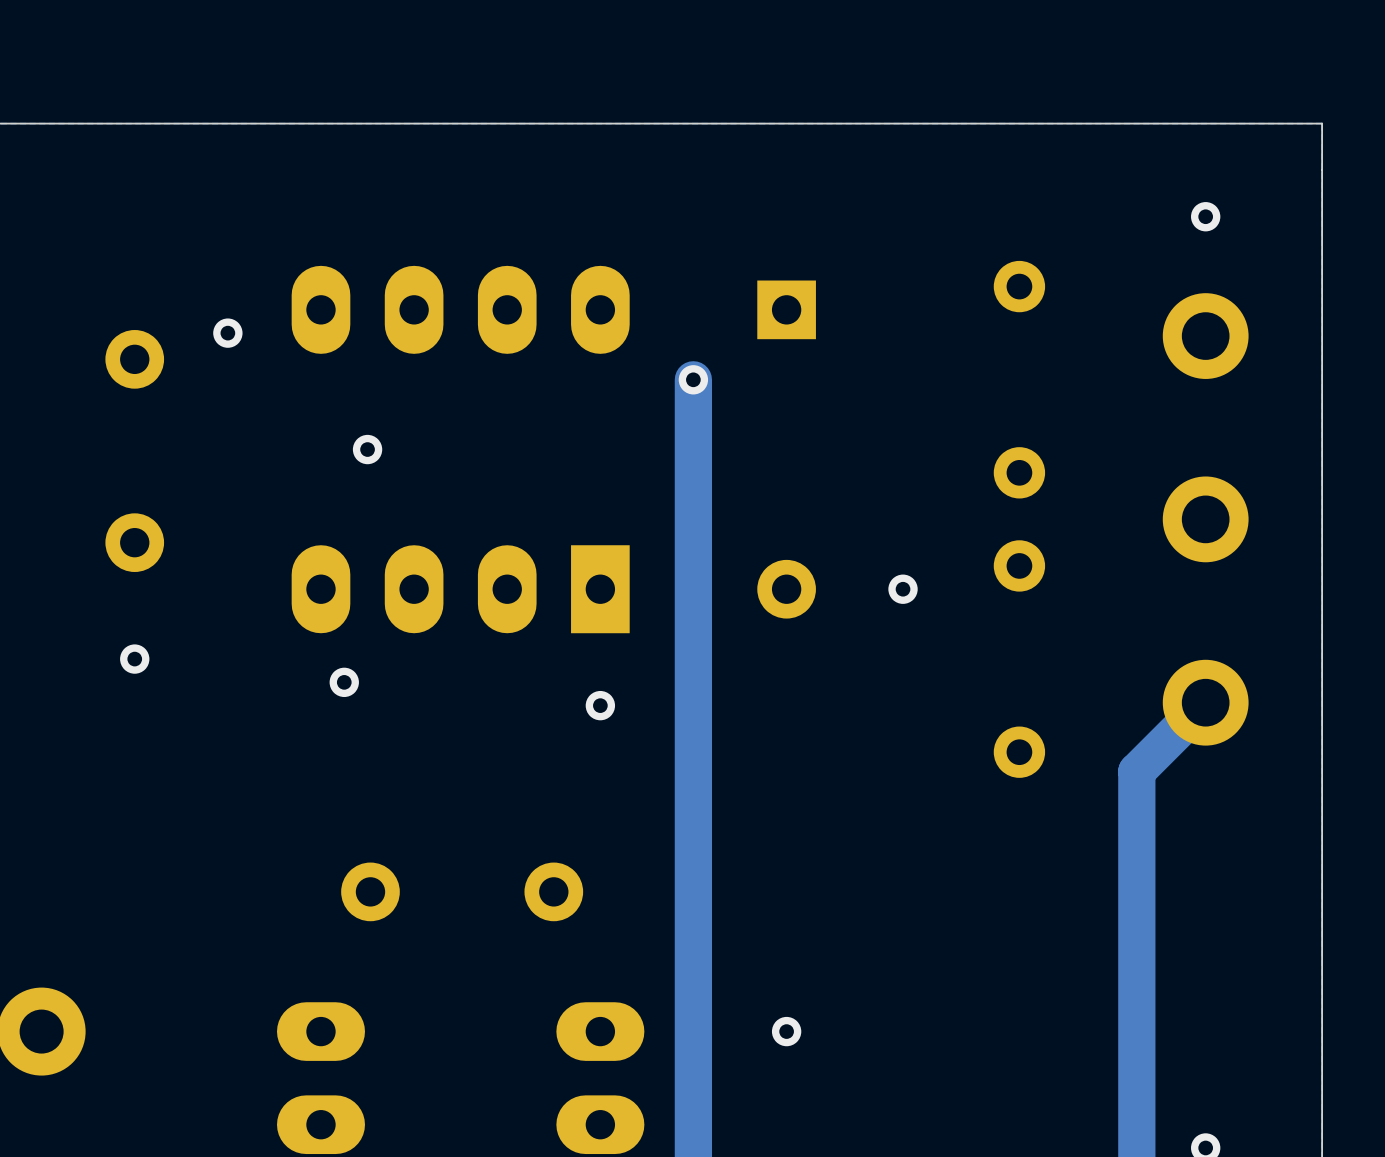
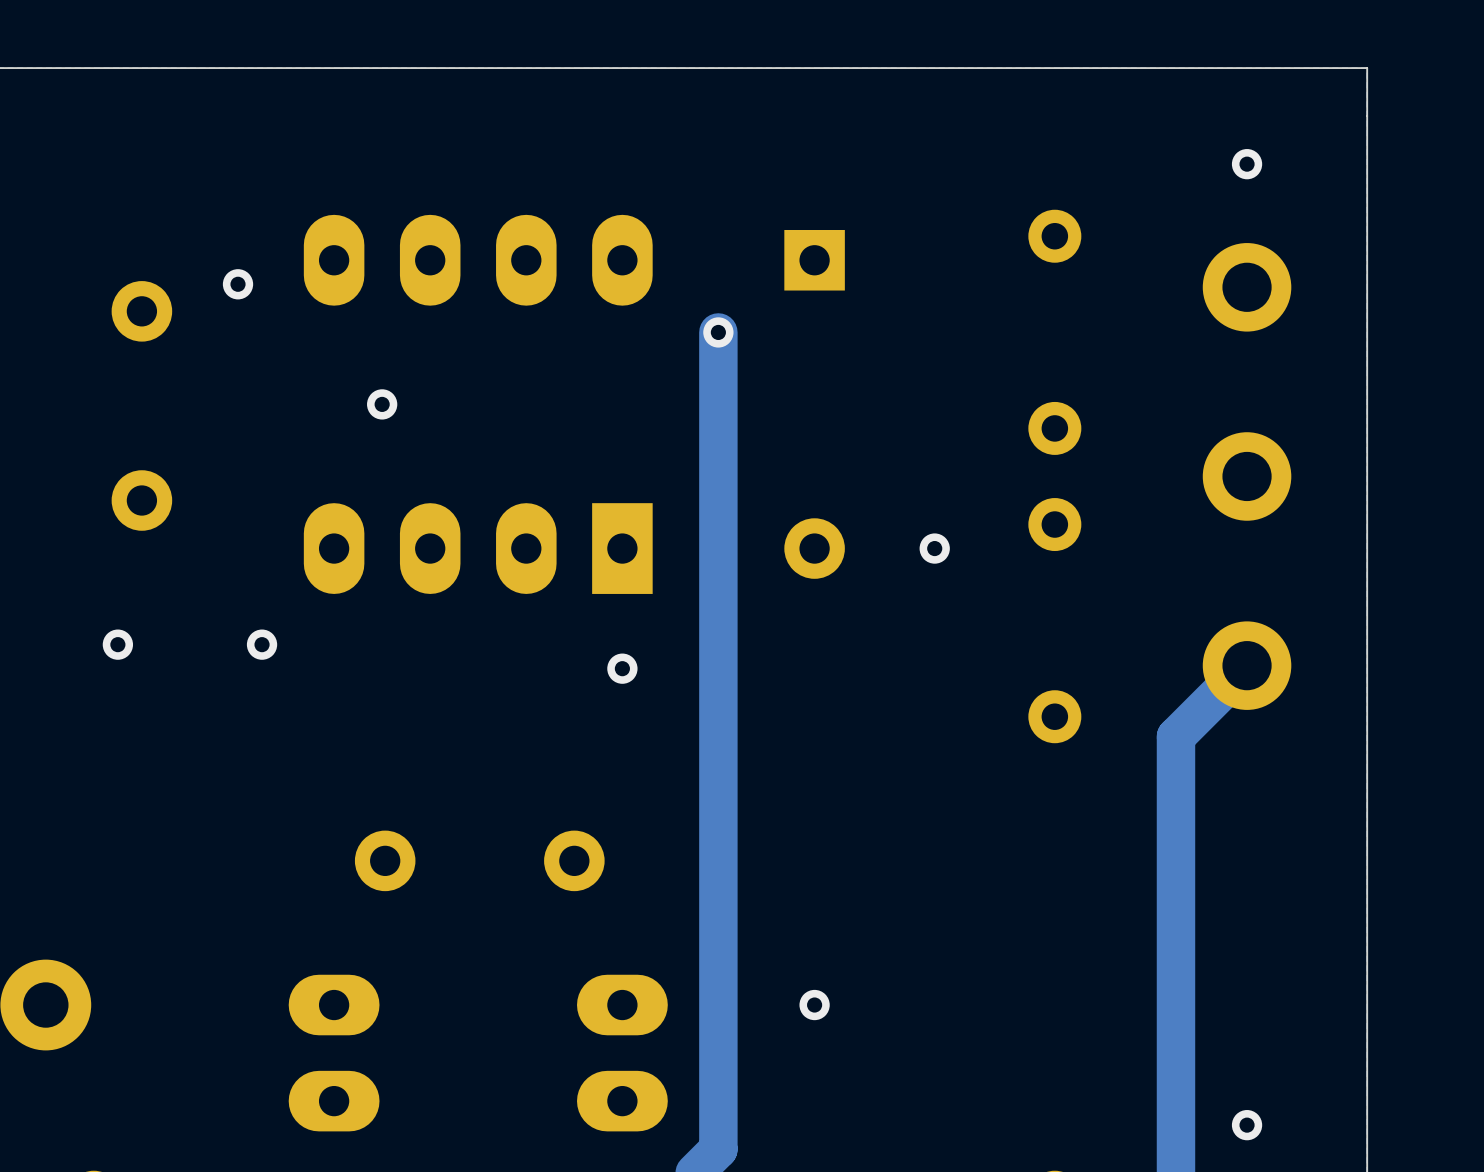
via position: (134, 659) -> (117, 644)
via: none -> (262, 644)
via: (344, 682) -> none

